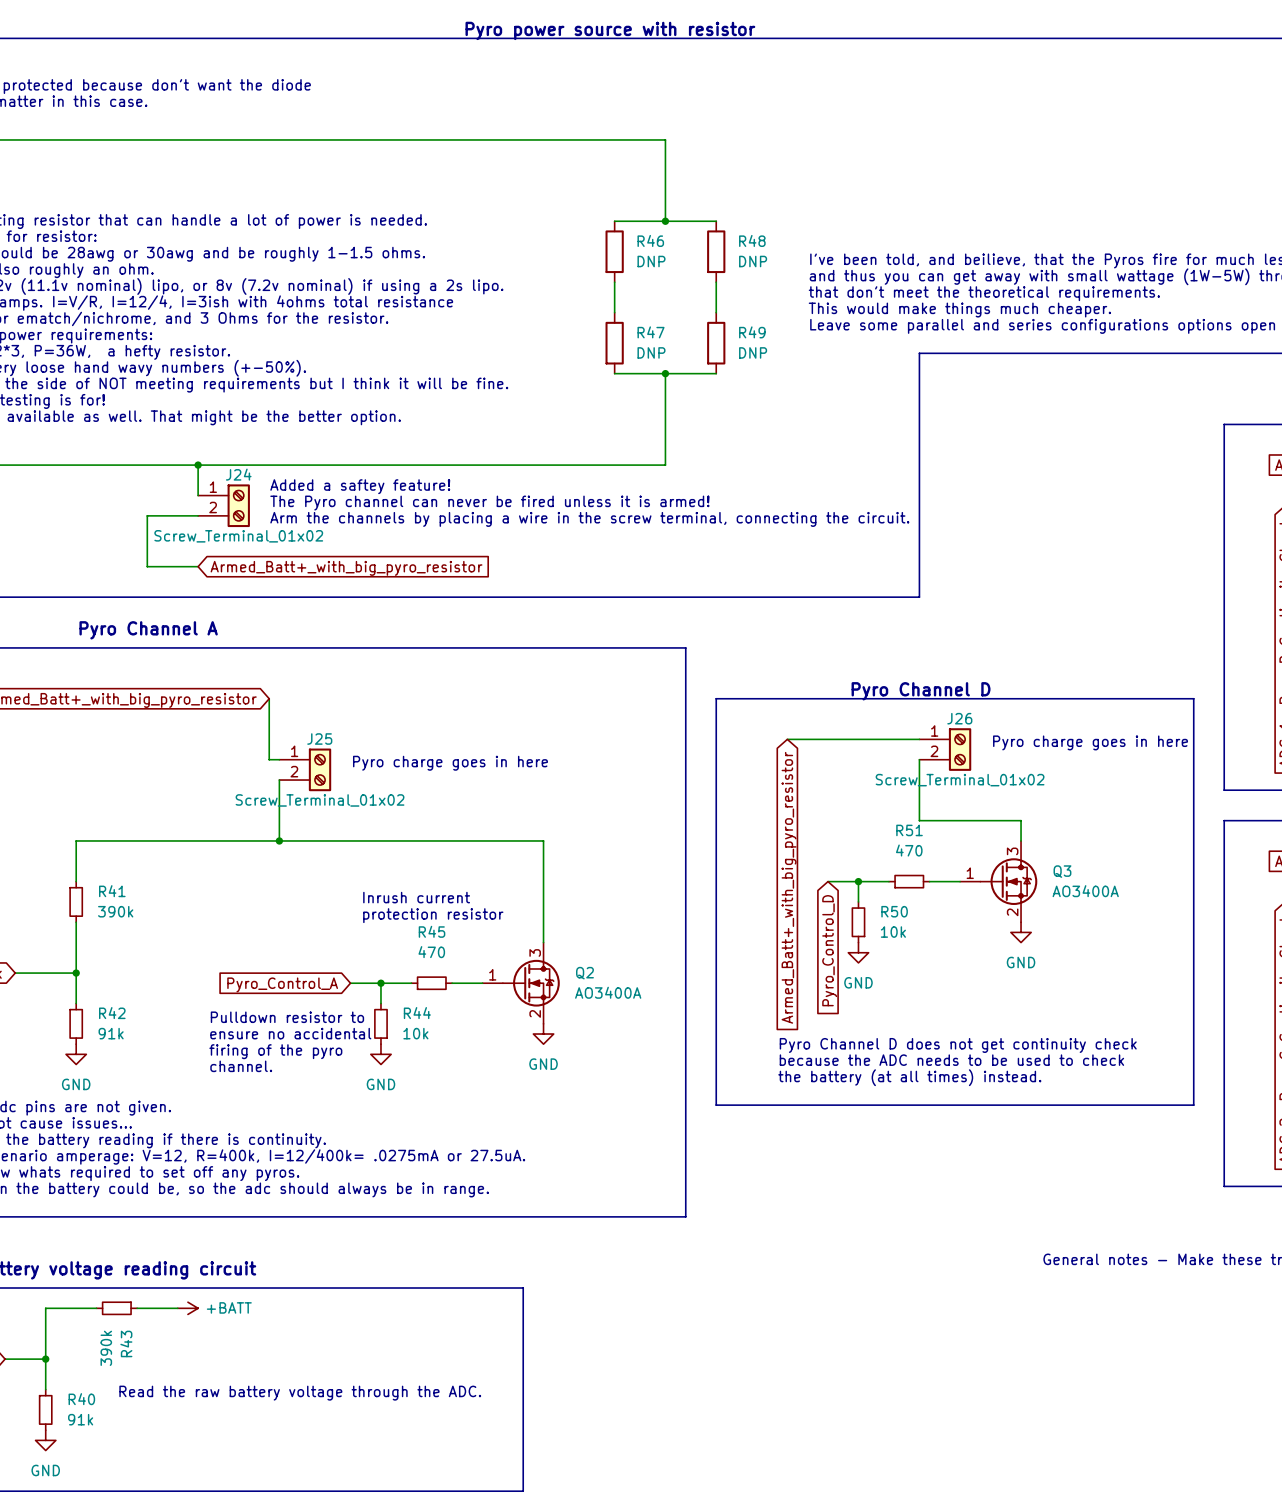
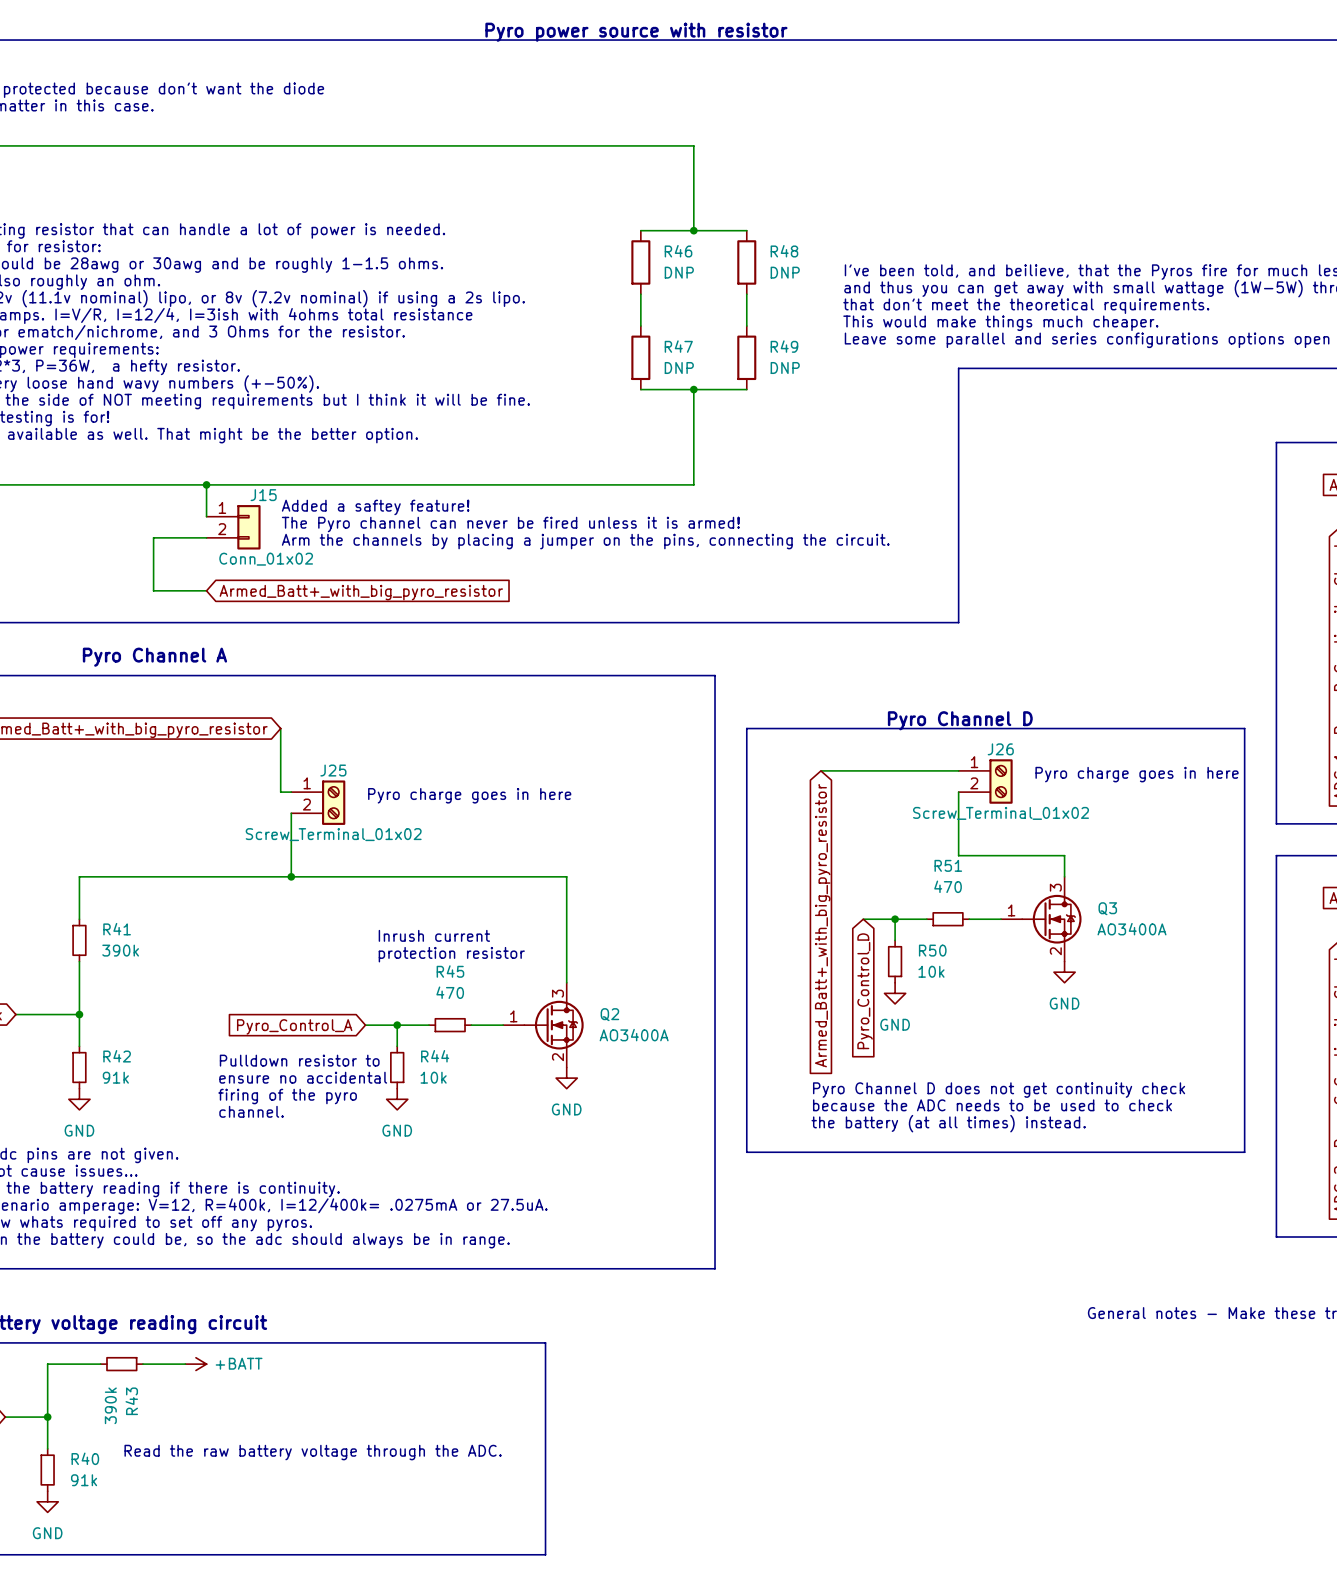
J24: Screw_Terminal_01x02 (224, 505) -> none
J15: none -> Conn_01x02 (233, 527)
text: Arm the channels by placing a wire in the screw terminal, connecting the circuit. (589, 519) -> Arm the channels by placing a jumper on the pins, connecting the circuit. (585, 541)

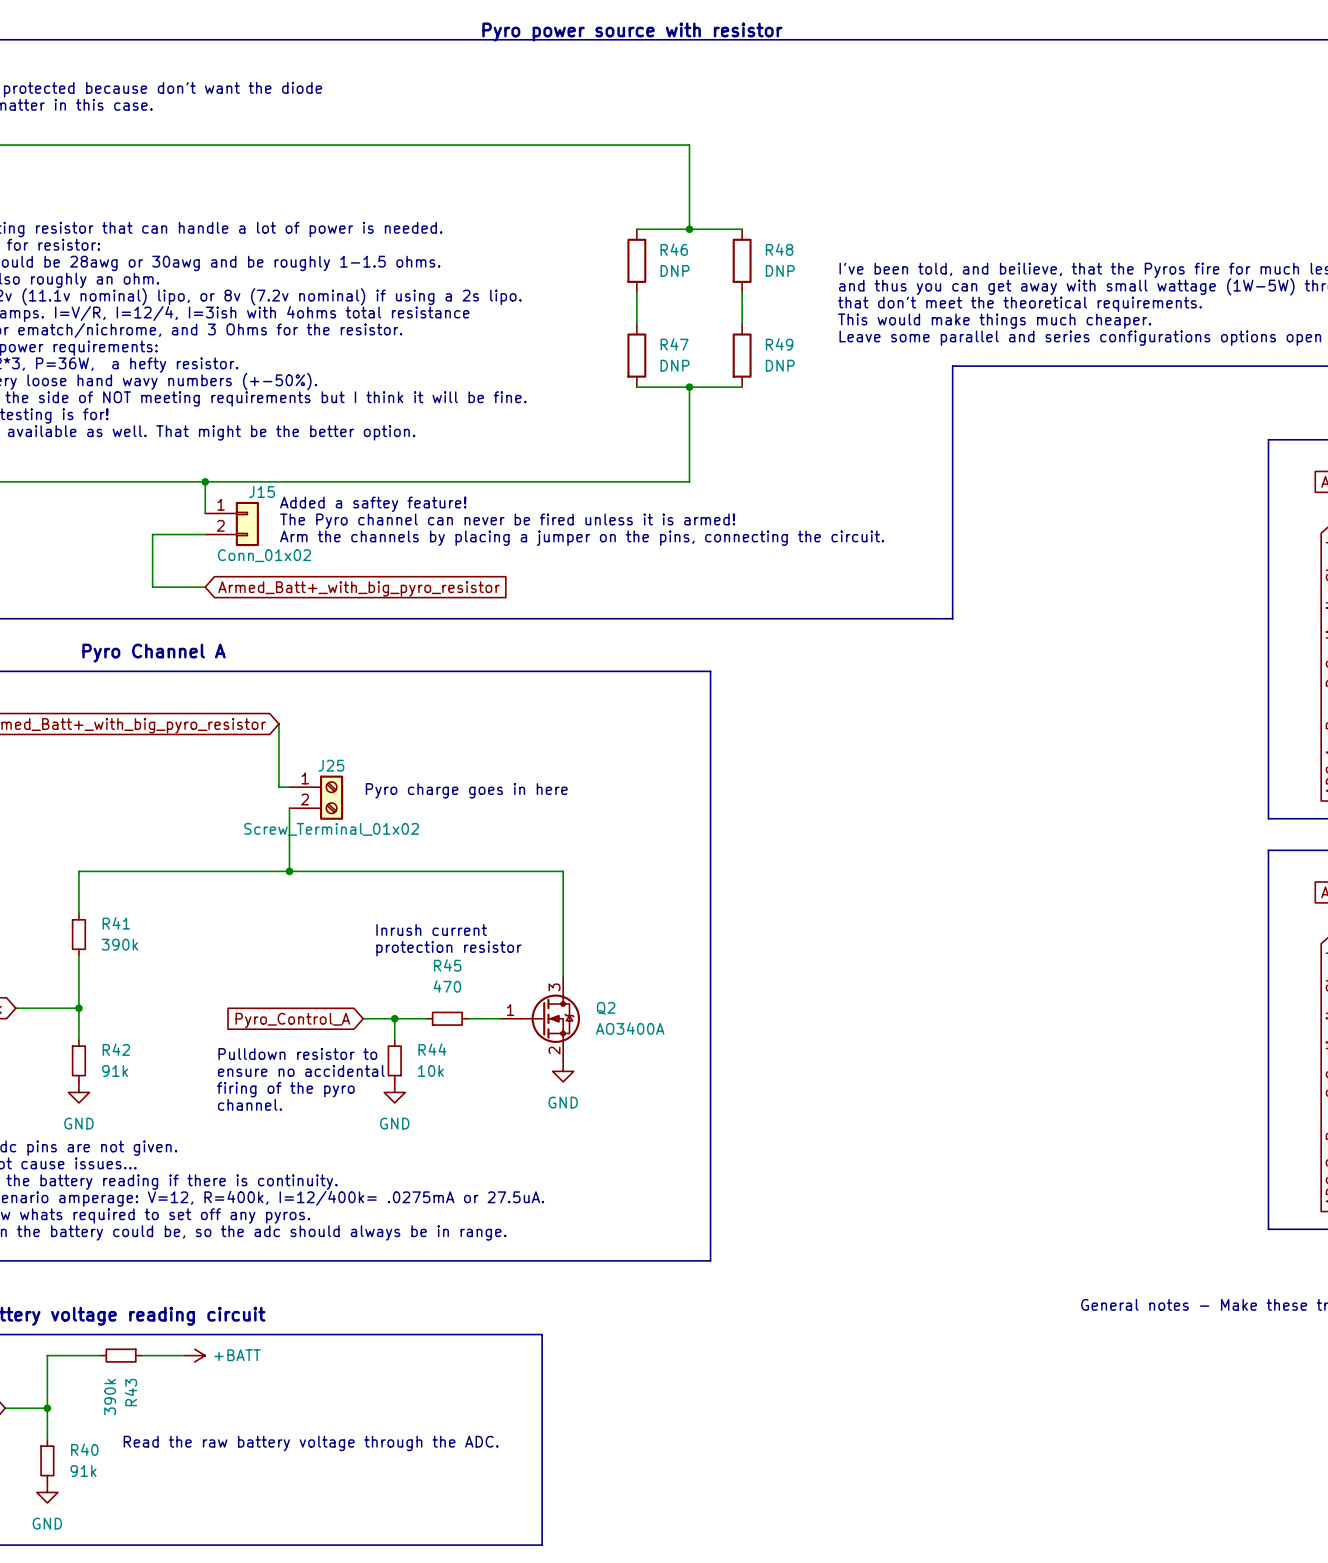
text: Pyro Channel D (960, 720) -> none
line: (746, 728) (1244, 728) (1244, 1152) (746, 1152) (746, 728) -> none
wire: (820, 770) (958, 770) -> none
text: Pyro charge goes in here (1137, 774) -> none
J26: Screw_Terminal_01x02 (985, 781) -> none
wire: (958, 792) (958, 855) (1064, 855) (1064, 876) -> none
wire: (863, 919) (926, 919) -> none
wire: (895, 919) (895, 940) -> none
junction: (895, 919) -> none
R51: 470 (948, 919) -> none
wire: (969, 919) (1001, 919) -> none
Q3: AO3400A (1041, 919) -> none
global label: Armed_Batt+_with_big_pyro_resistor (822, 925) -> none
R50: 10k (895, 961) -> none
power symbol: GND (1064, 972) -> none
global label: Pyro_Control_D (865, 991) -> none
power symbol: GND (895, 993) -> none
text: Pyro Channel D does not get continuity check (999, 1090) -> none
text: because the ADC needs to be used to check (992, 1105) -> none
text: the battery (at all times) instead. (948, 1123) -> none

